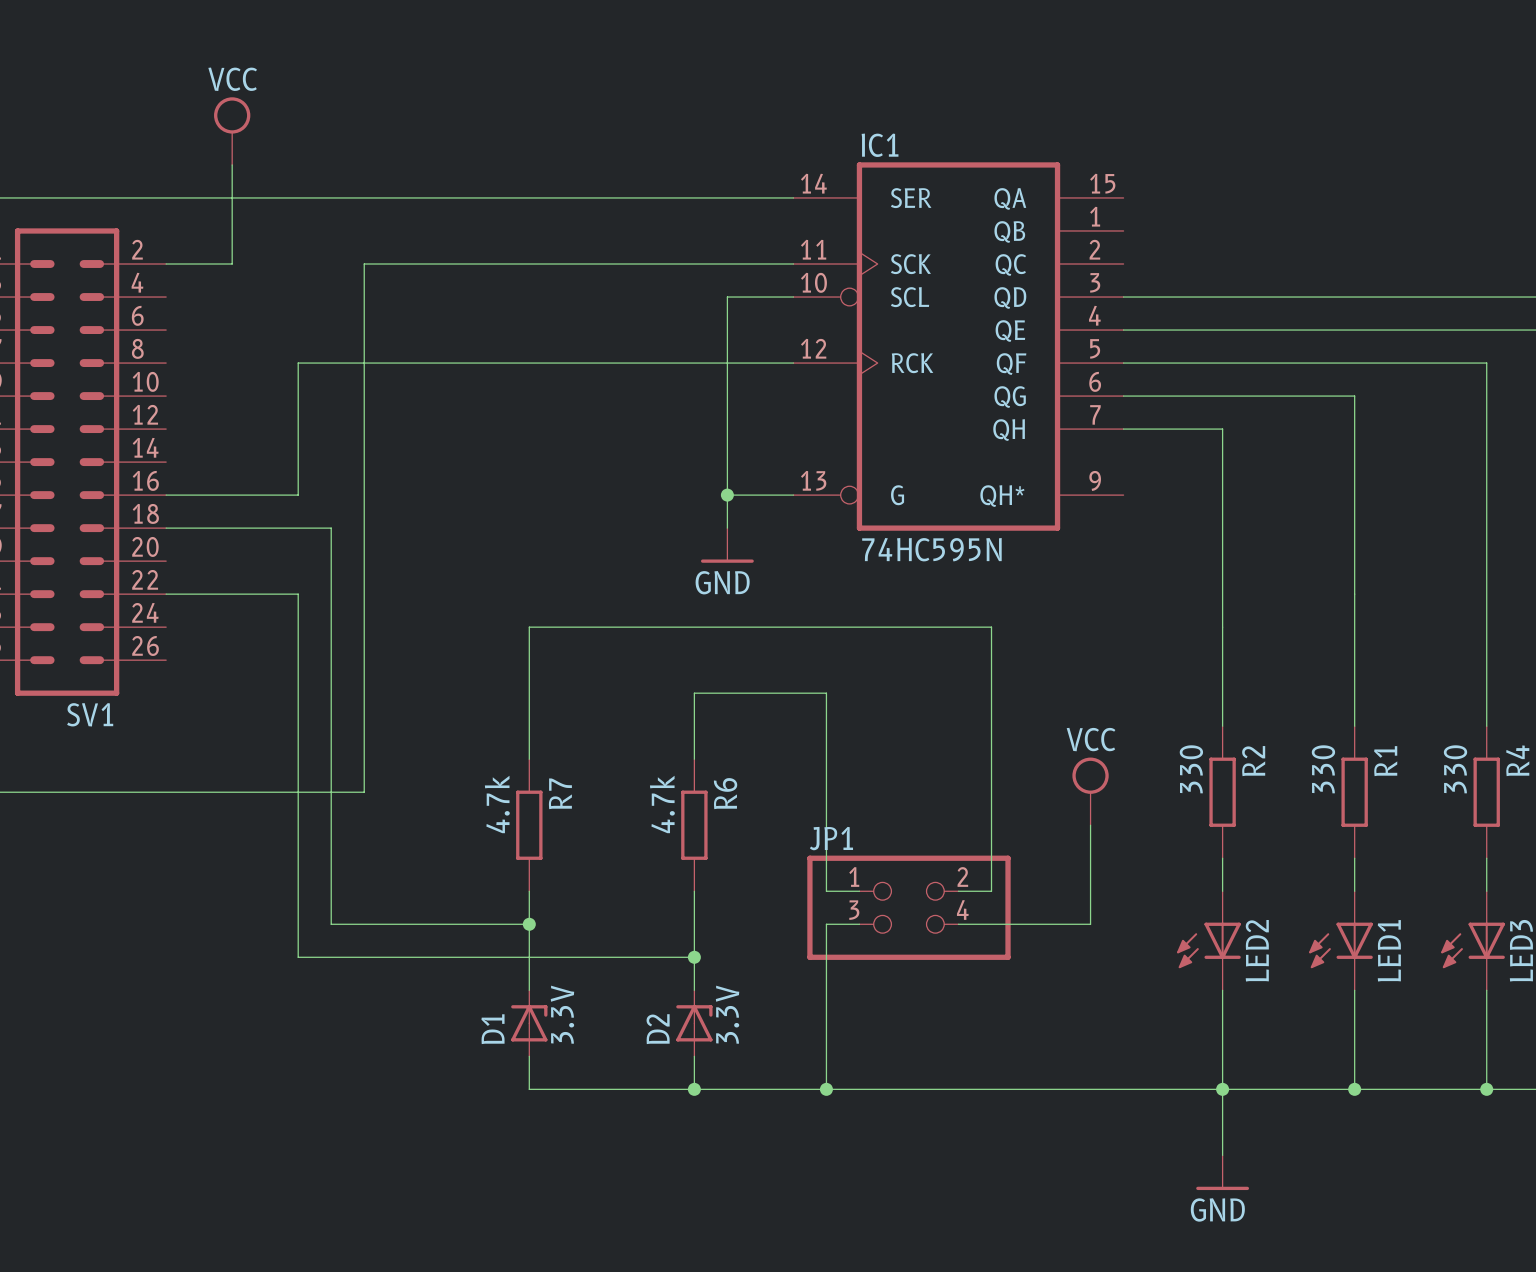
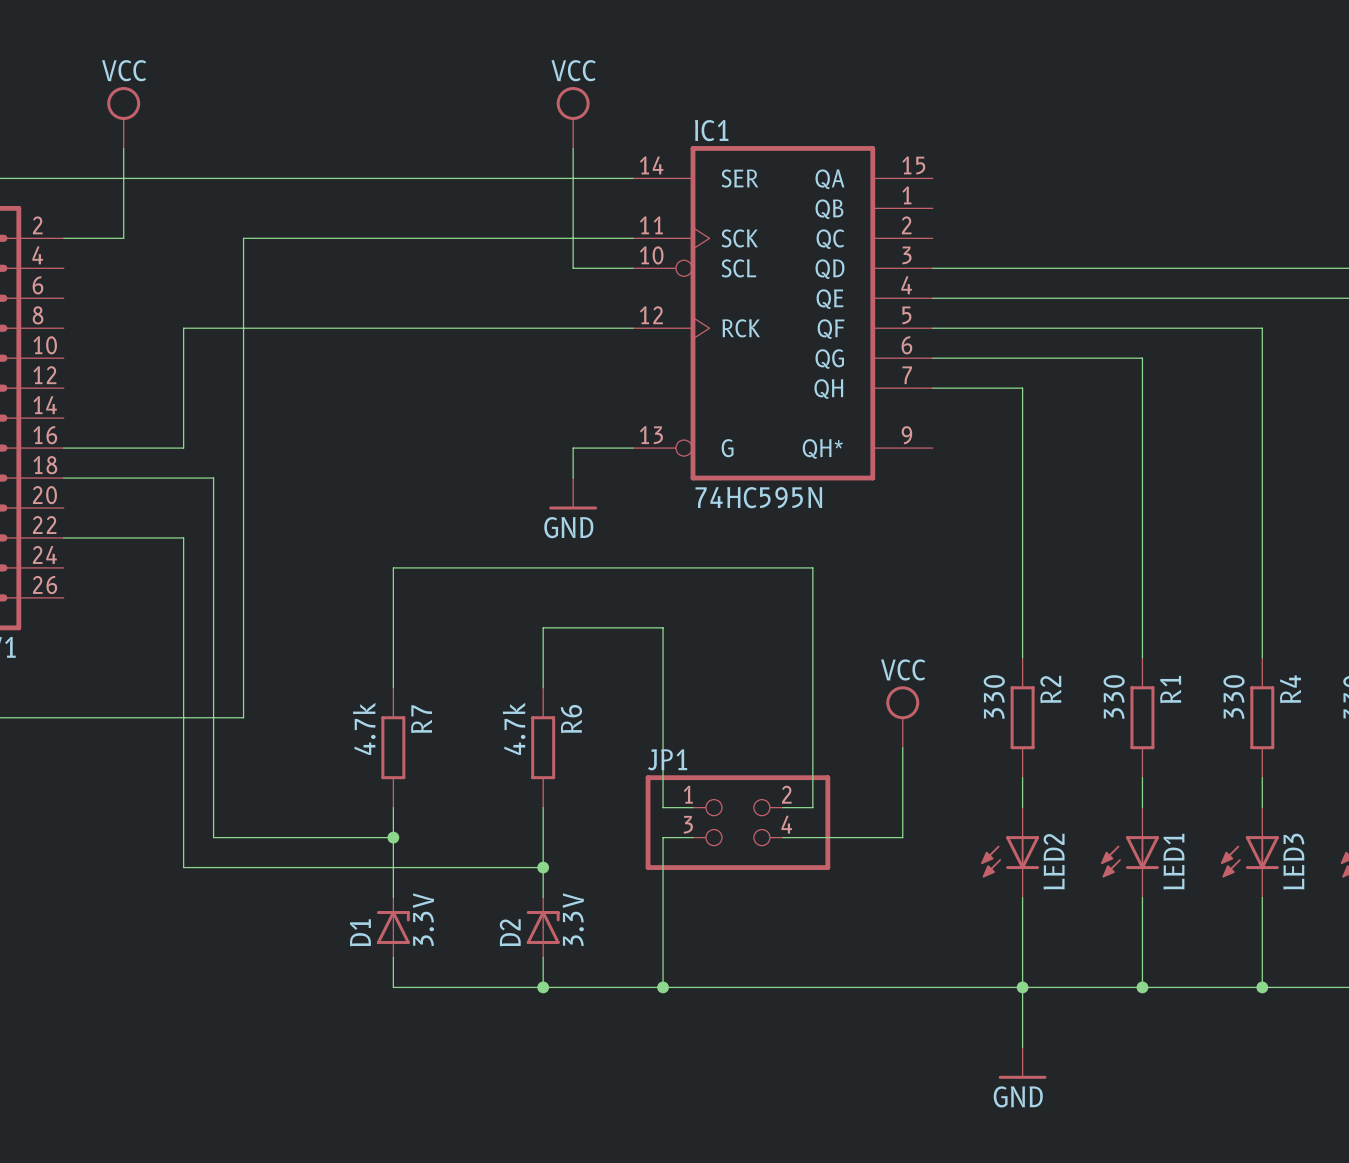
power symbol: none -> VCC (573, 117)
wire: (727, 297) (727, 495) -> (573, 268) (573, 148)
junction: (727, 495) -> none

